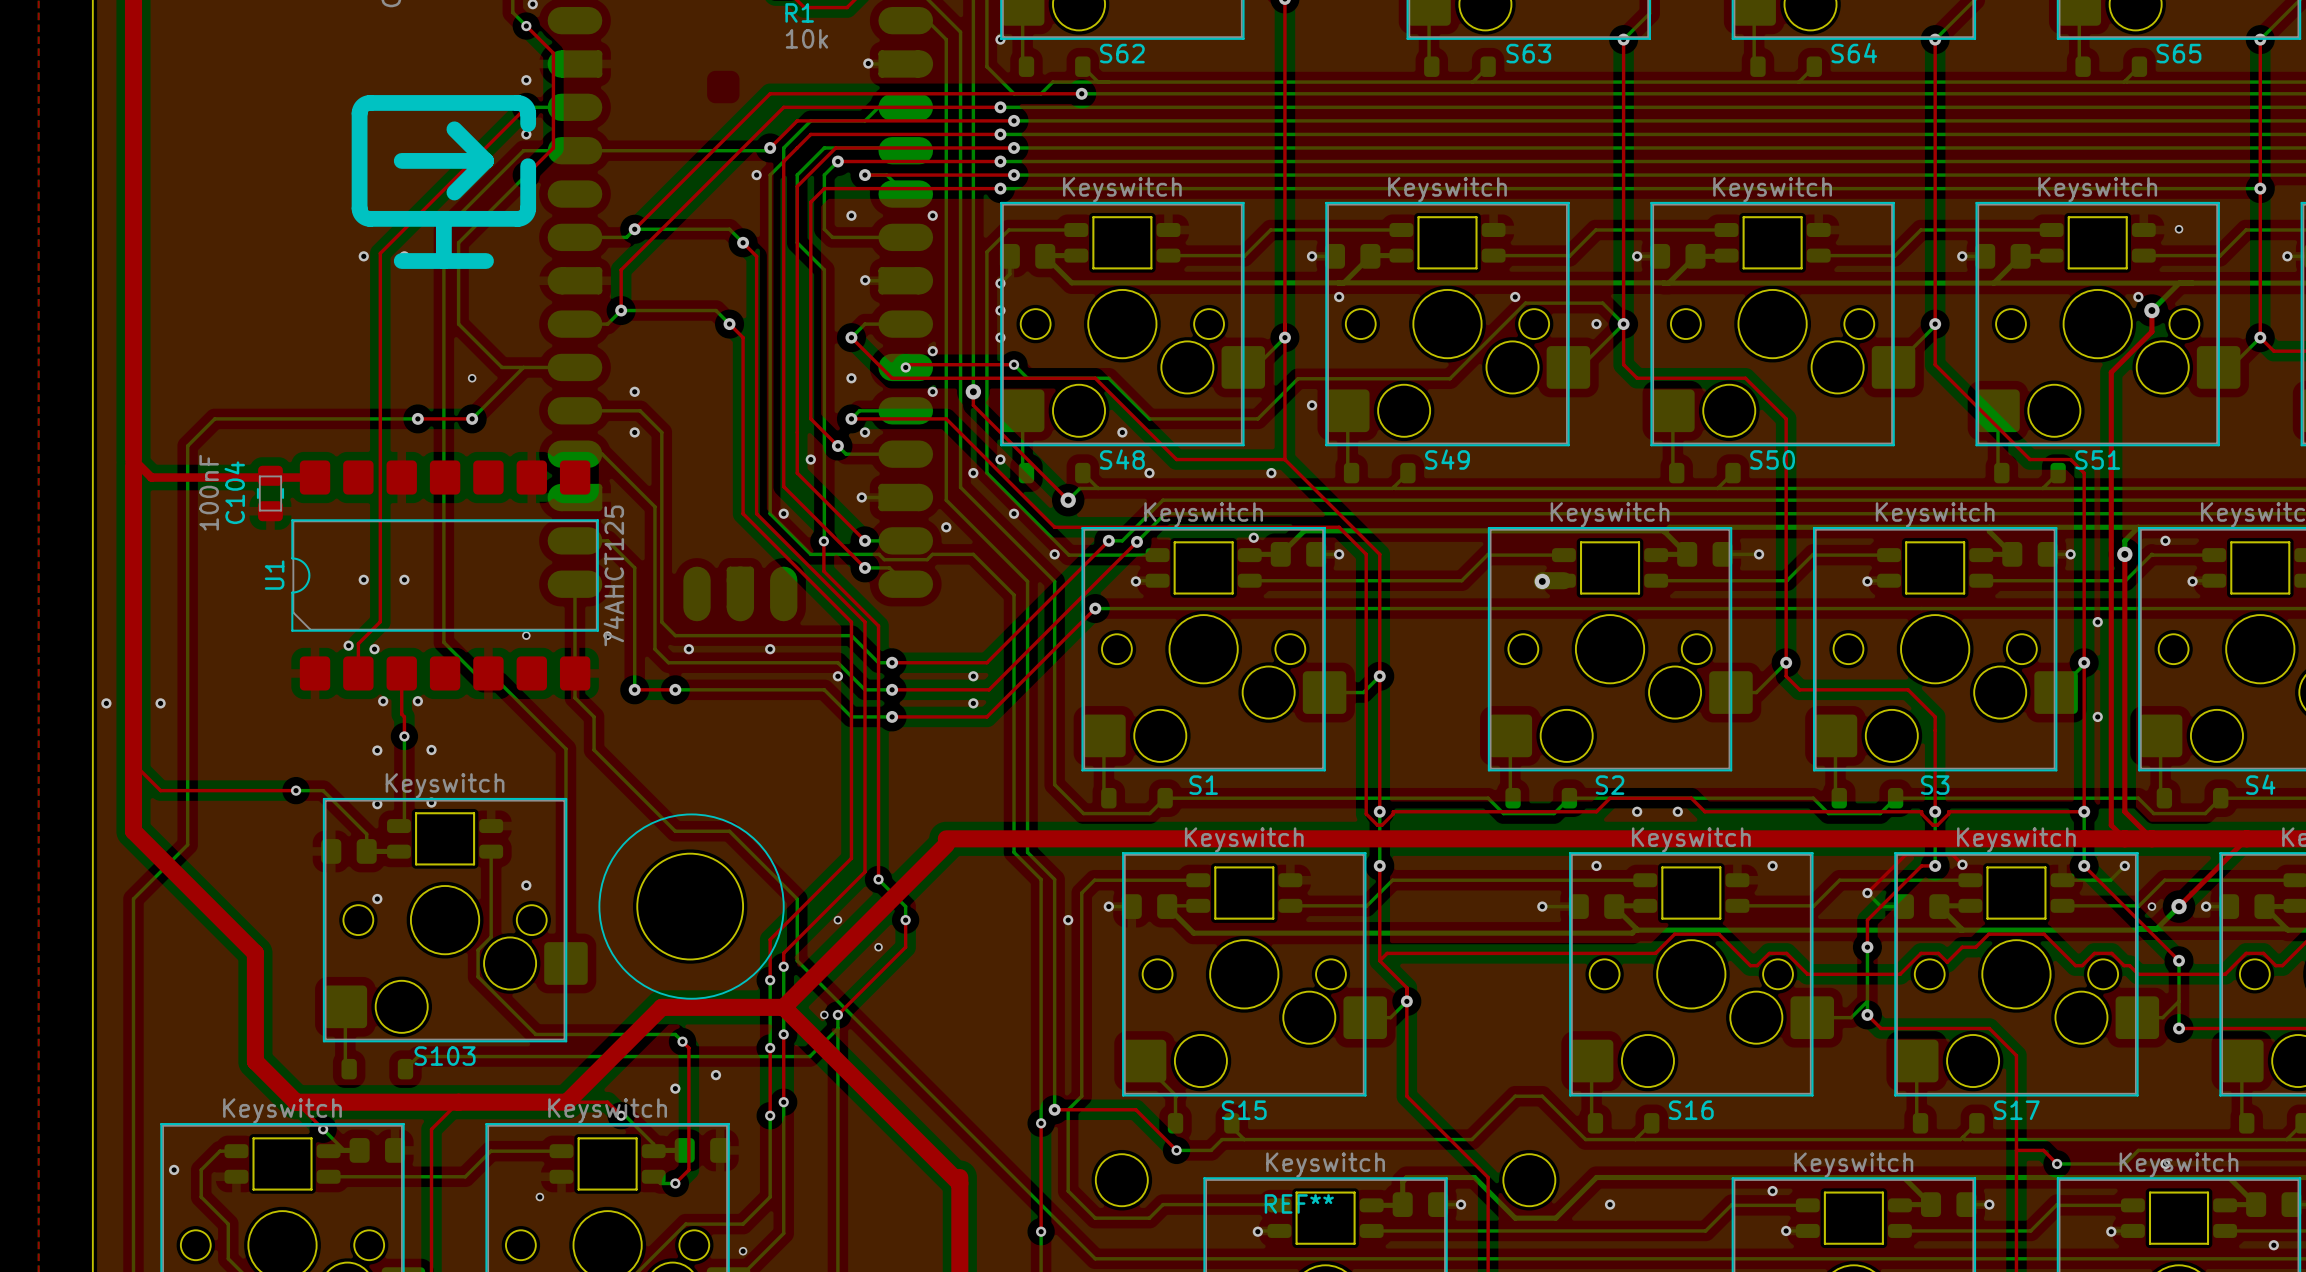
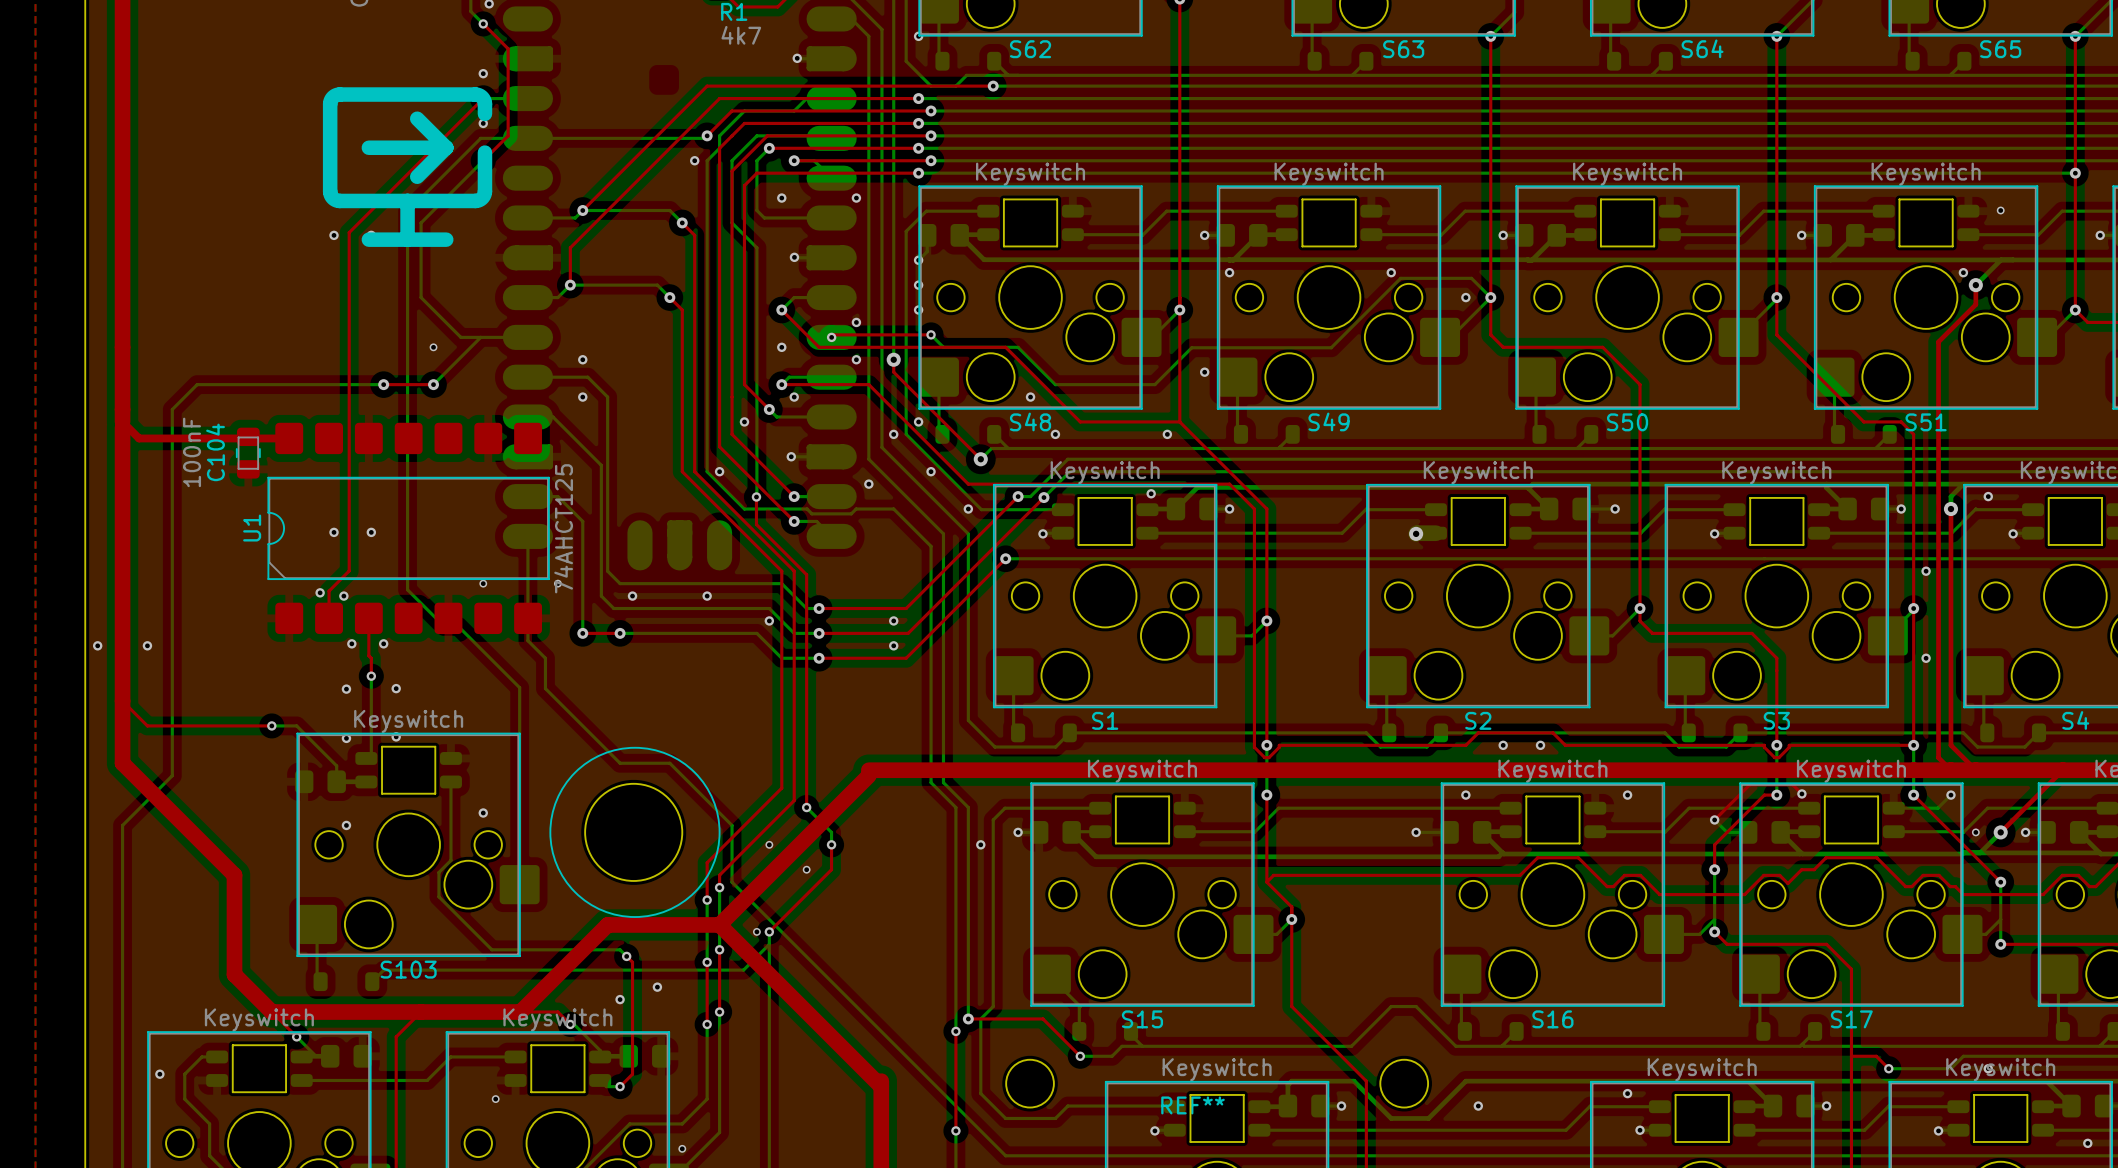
R1 value: 10k (806, 38) -> 4k7 (741, 35)

